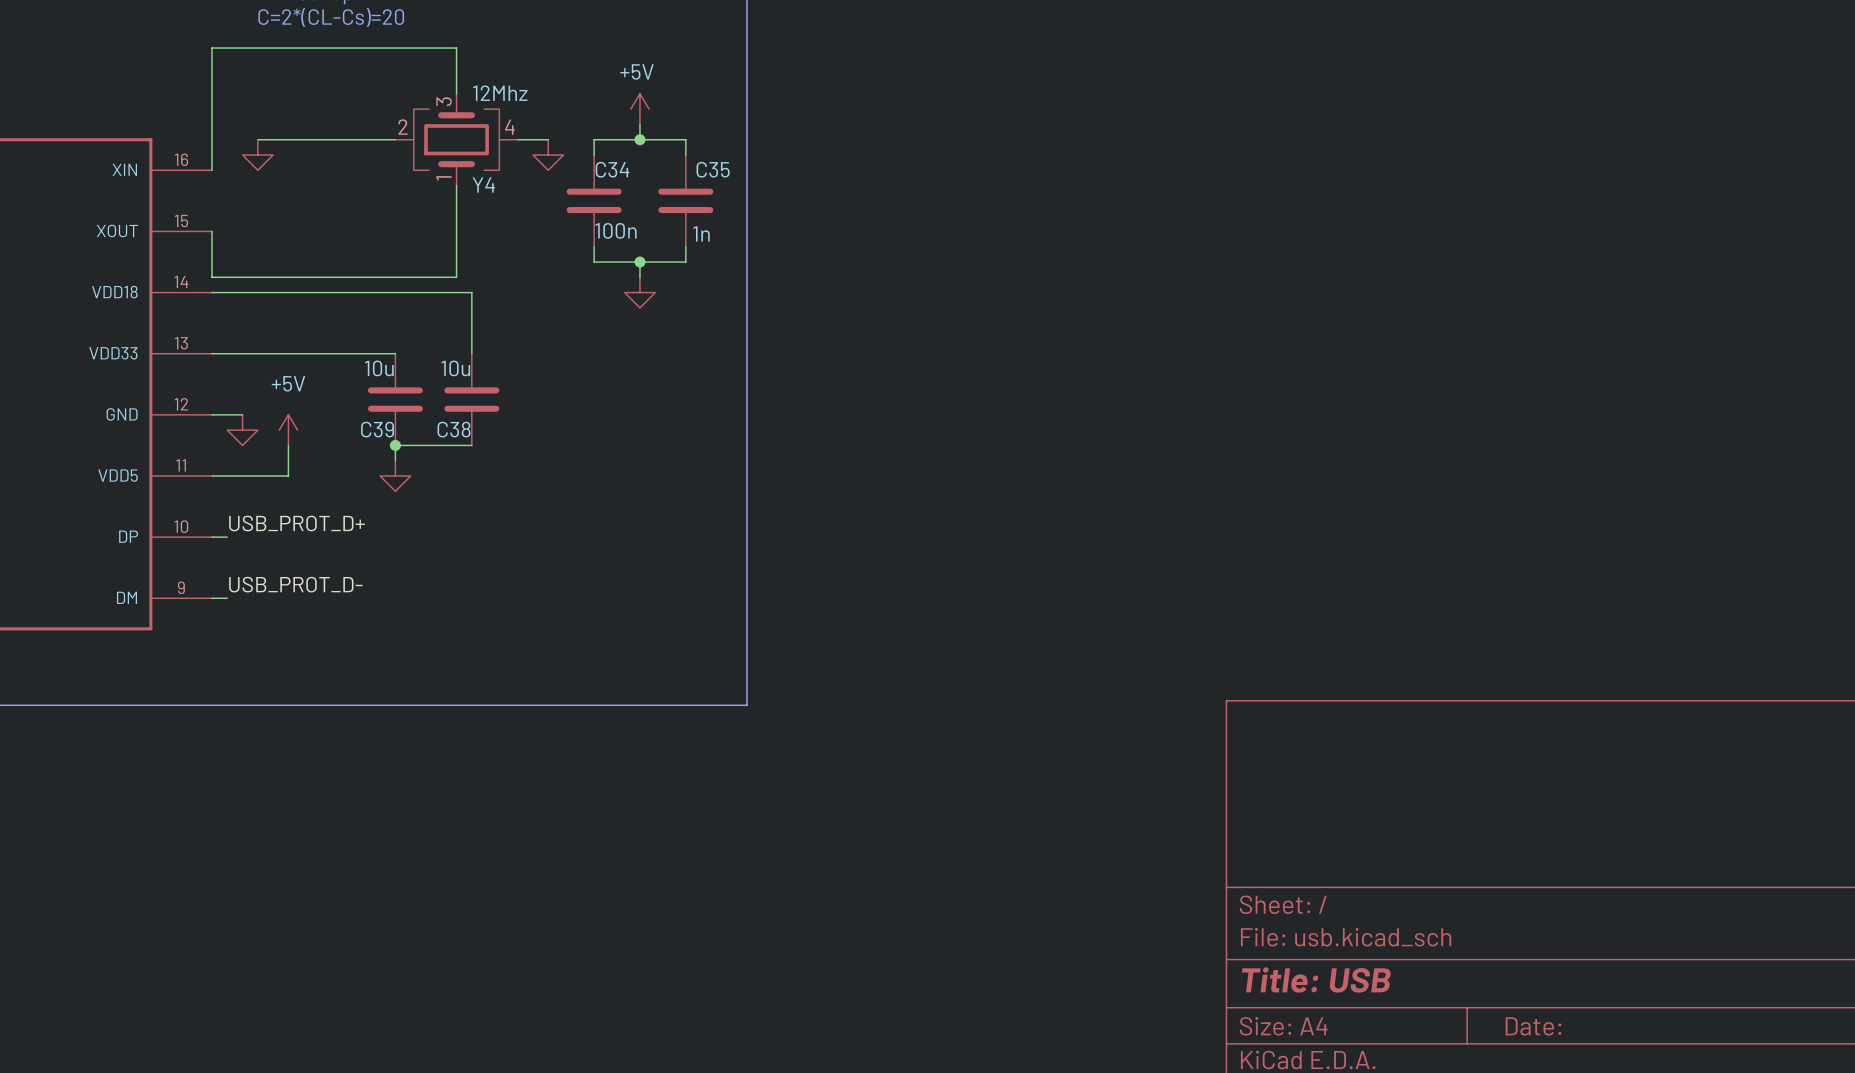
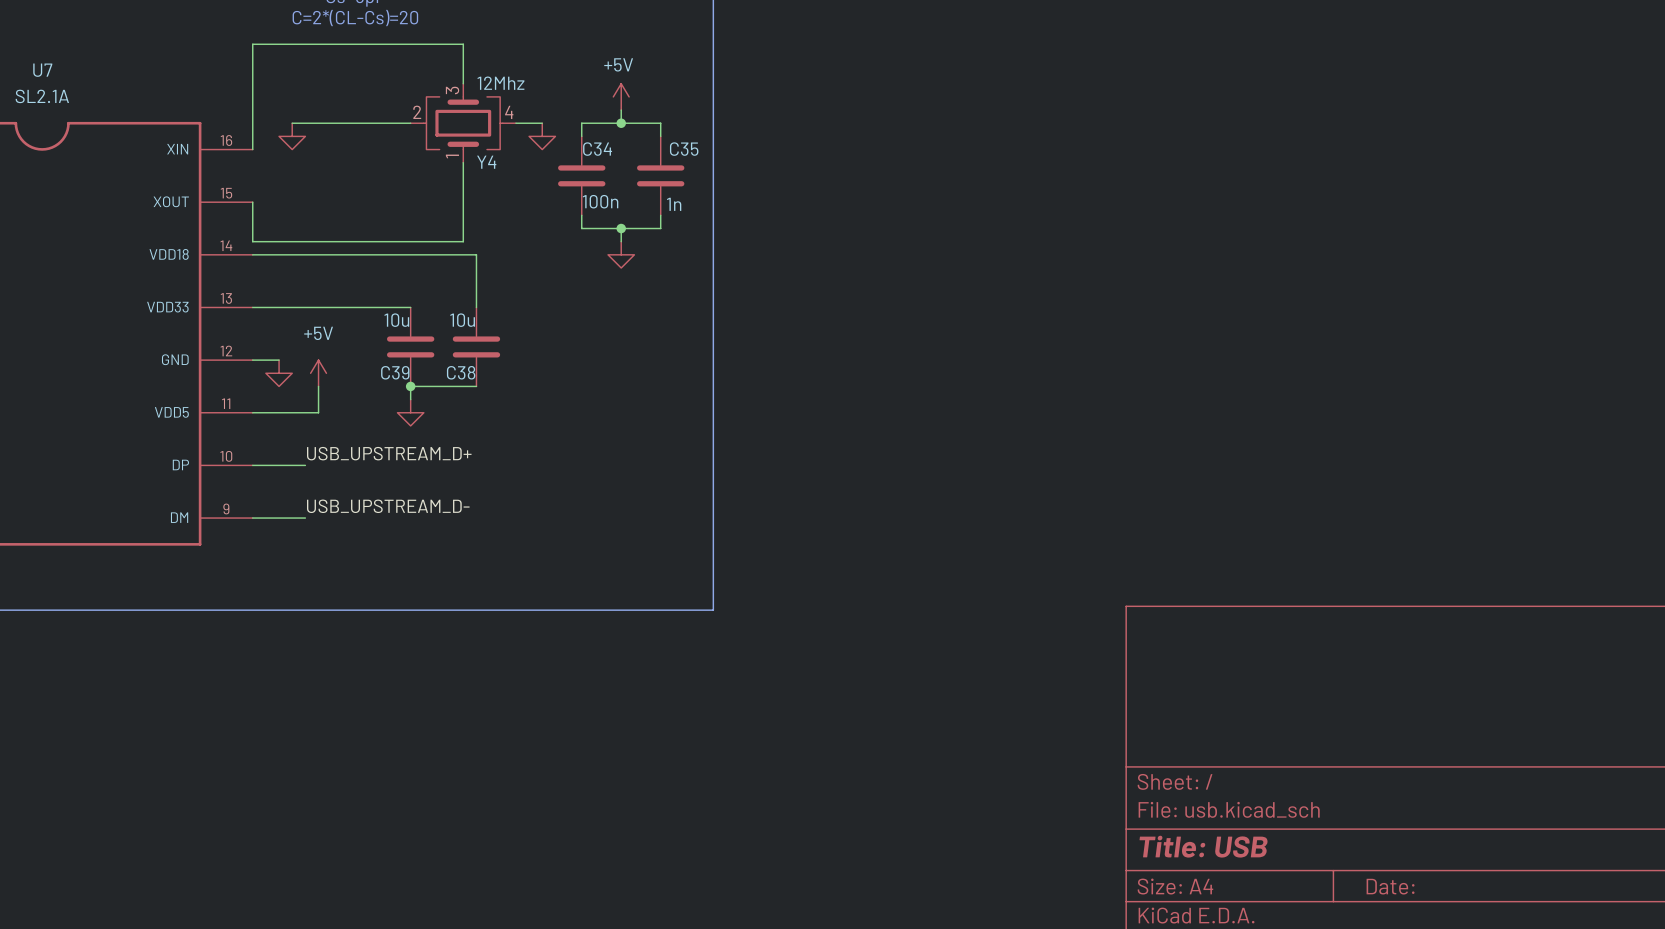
label: USB_PROT_D+ (297, 523) -> USB_UPSTREAM_D+ (389, 453)
wire: none -> (265, 465) (305, 465)
label: USB_PROT_D- (295, 584) -> USB_UPSTREAM_D- (388, 506)
wire: none -> (265, 518) (305, 518)

